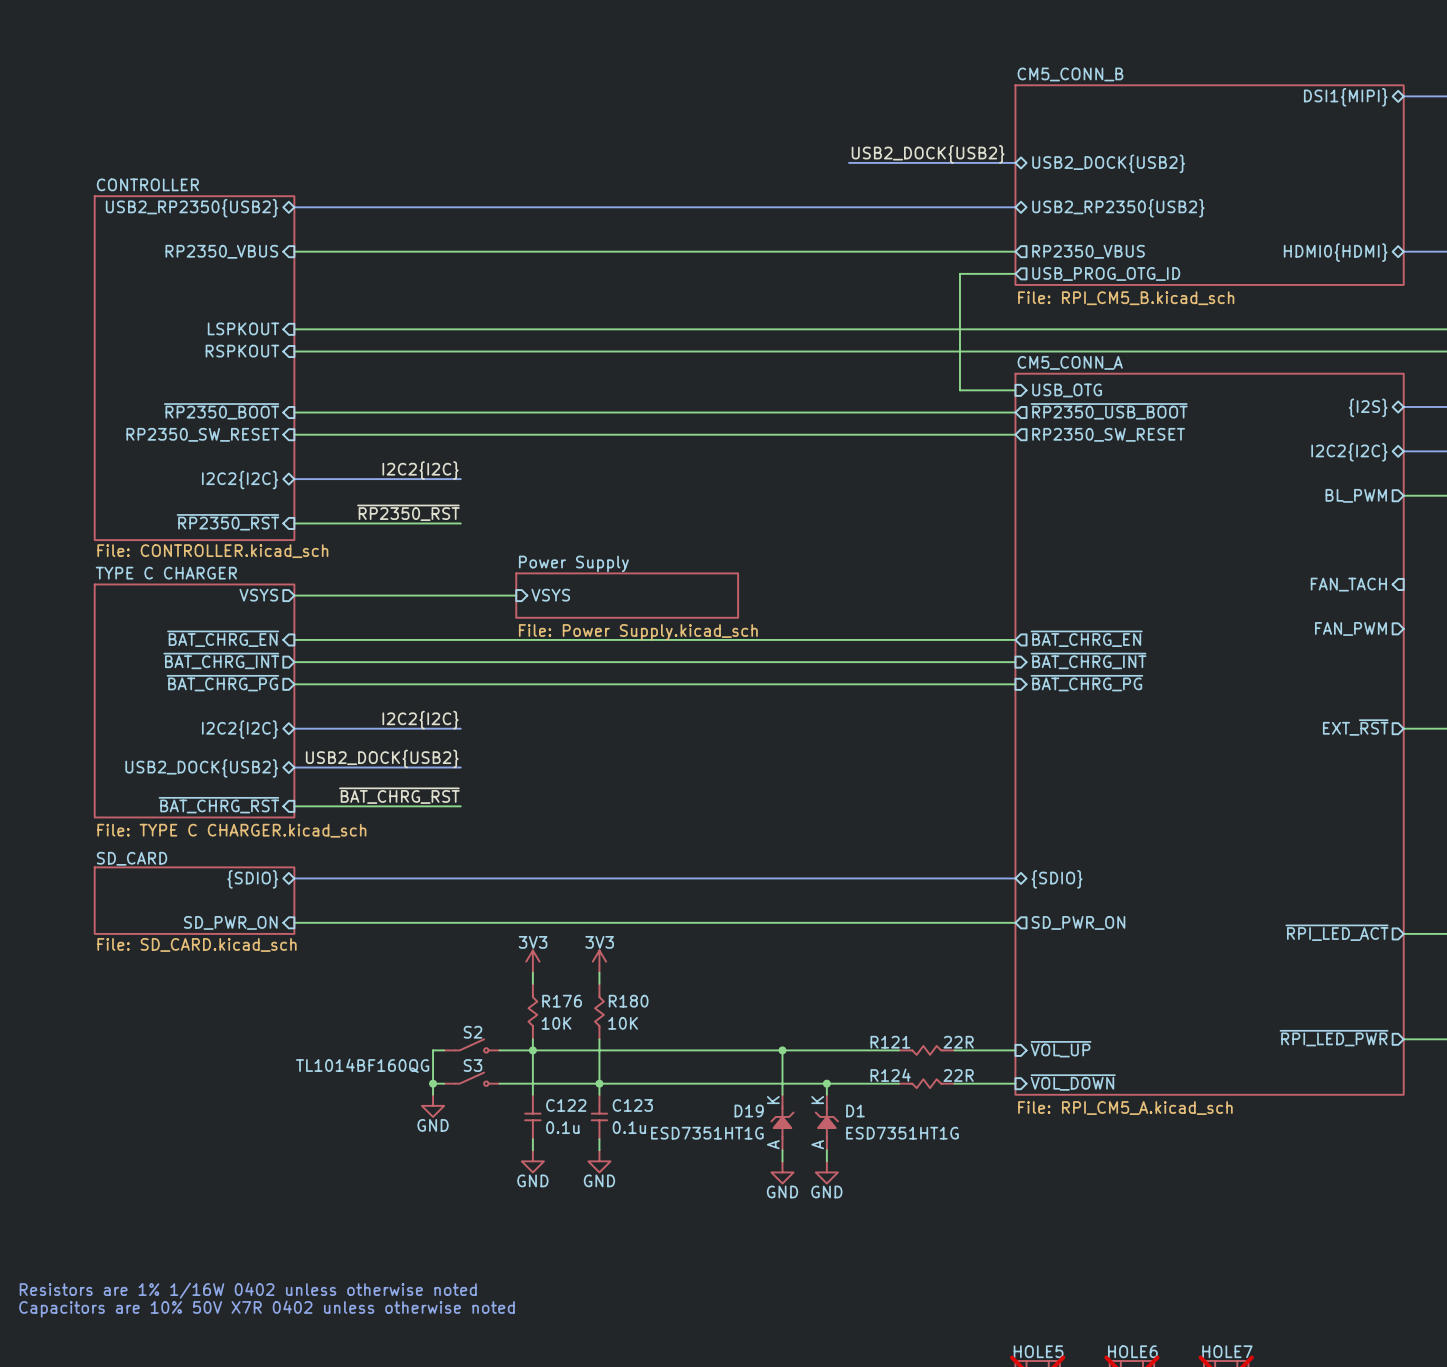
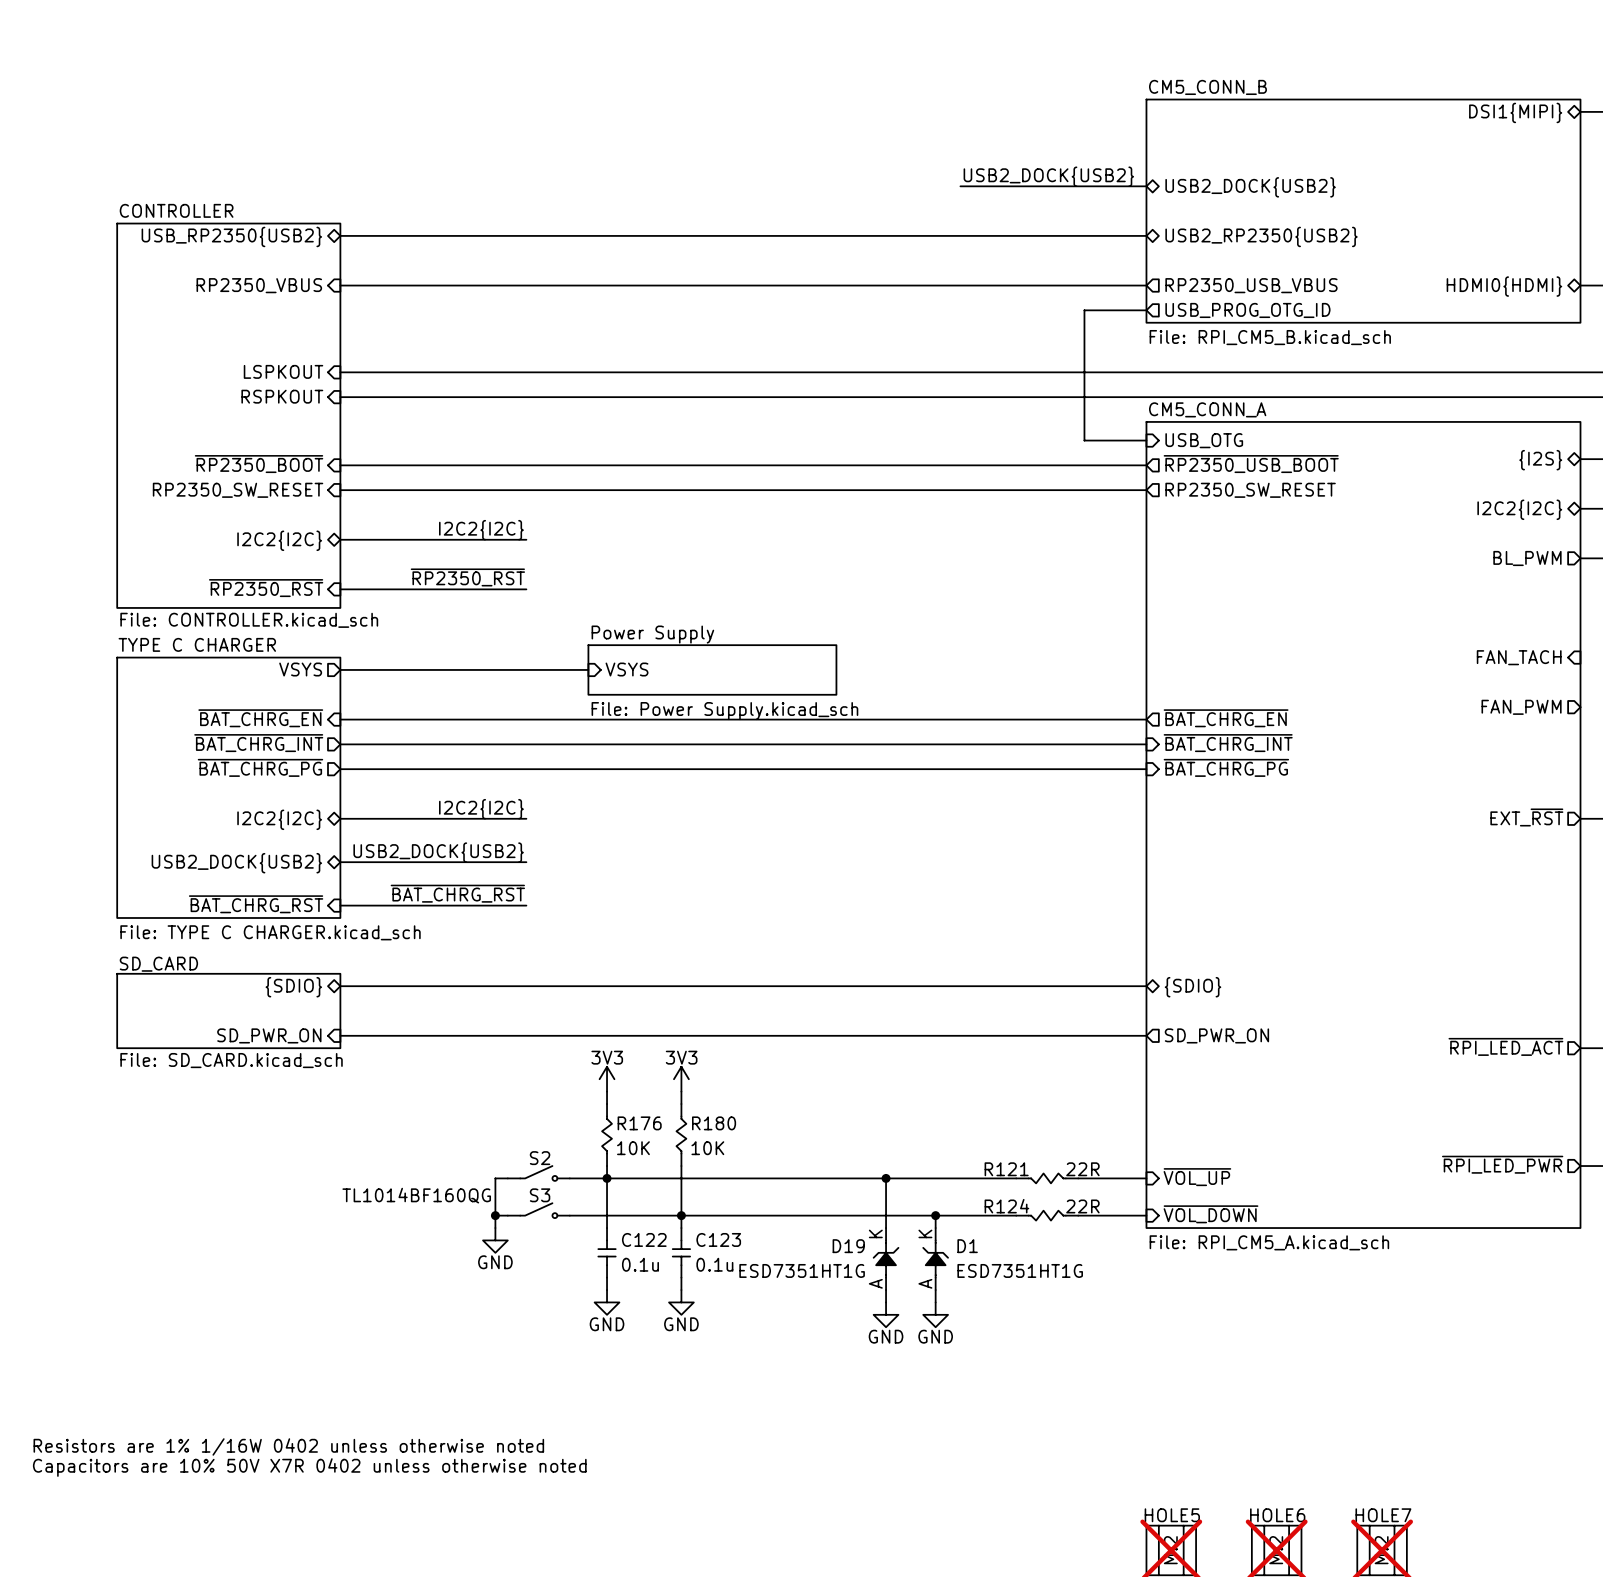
sheet pin: USB2_RP2350{USB2} (191, 208) -> USB_RP2350{USB2} (231, 236)
sheet pin: RP2350_VBUS (1088, 251) -> RP2350_USB_VBUS (1251, 285)

